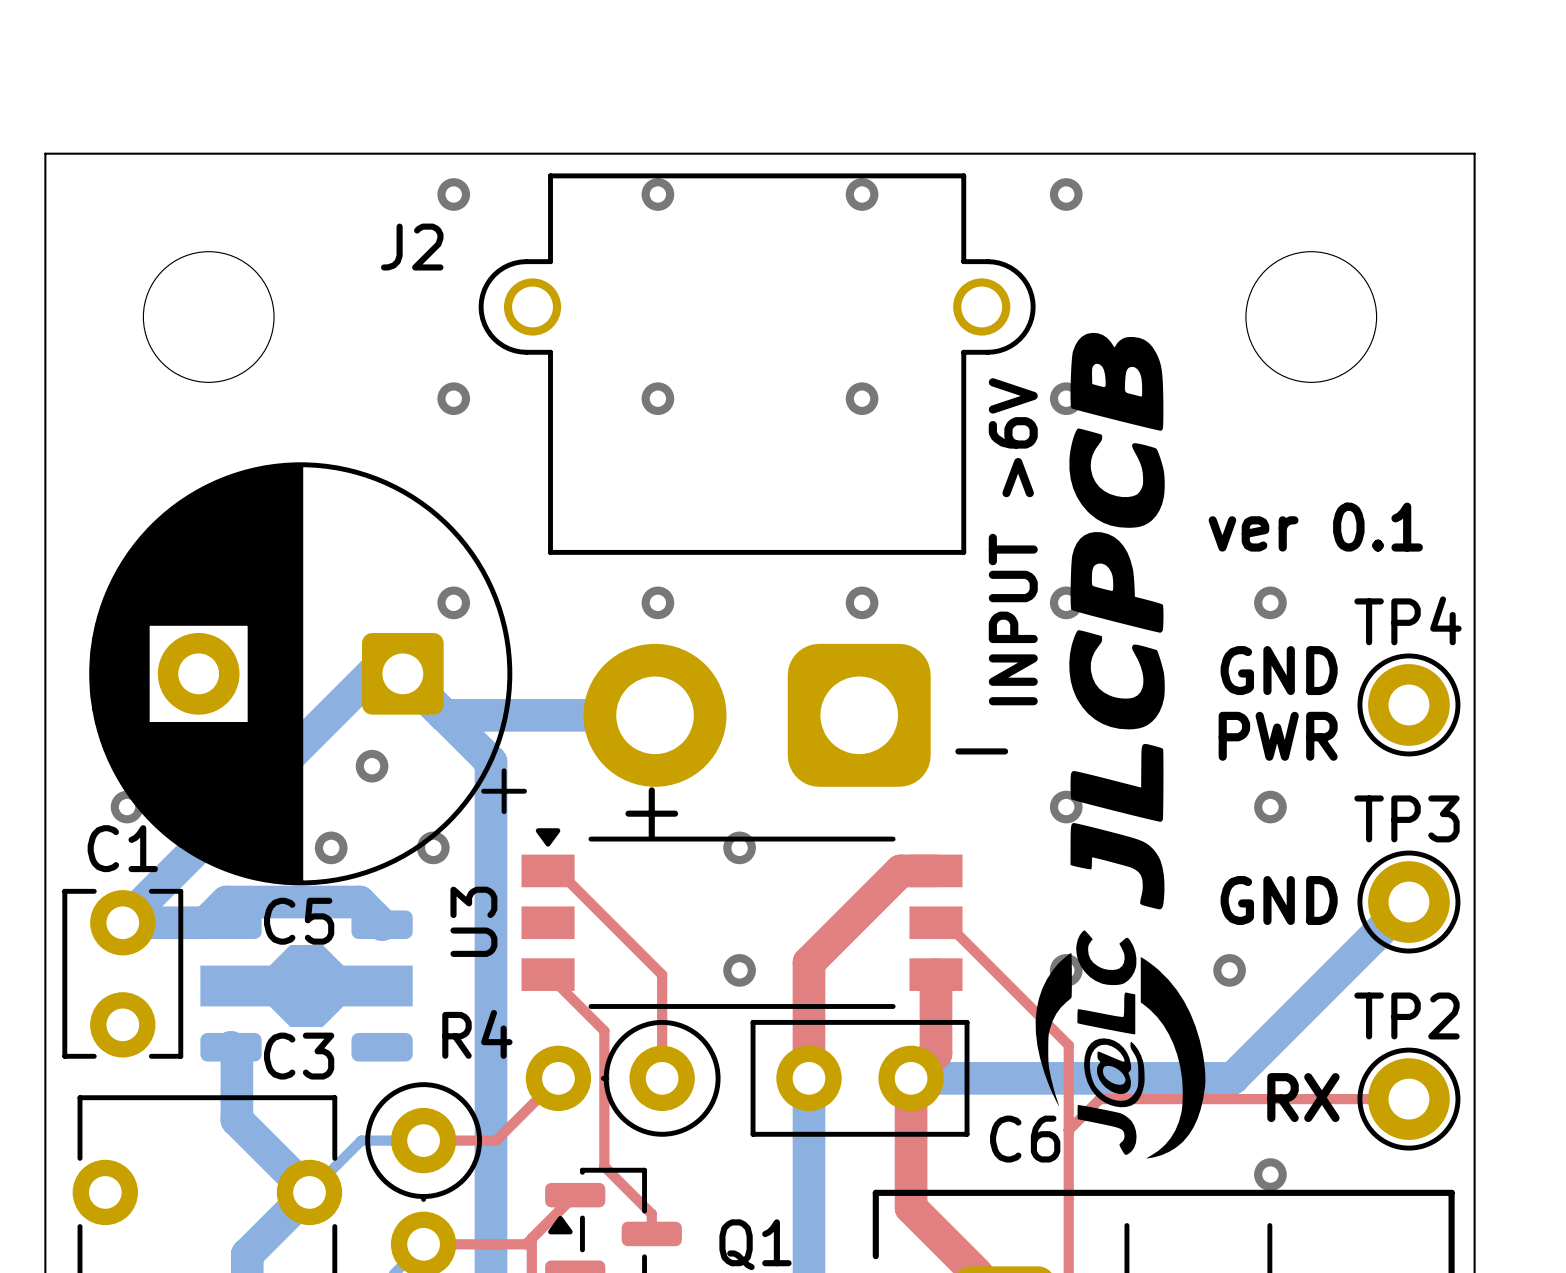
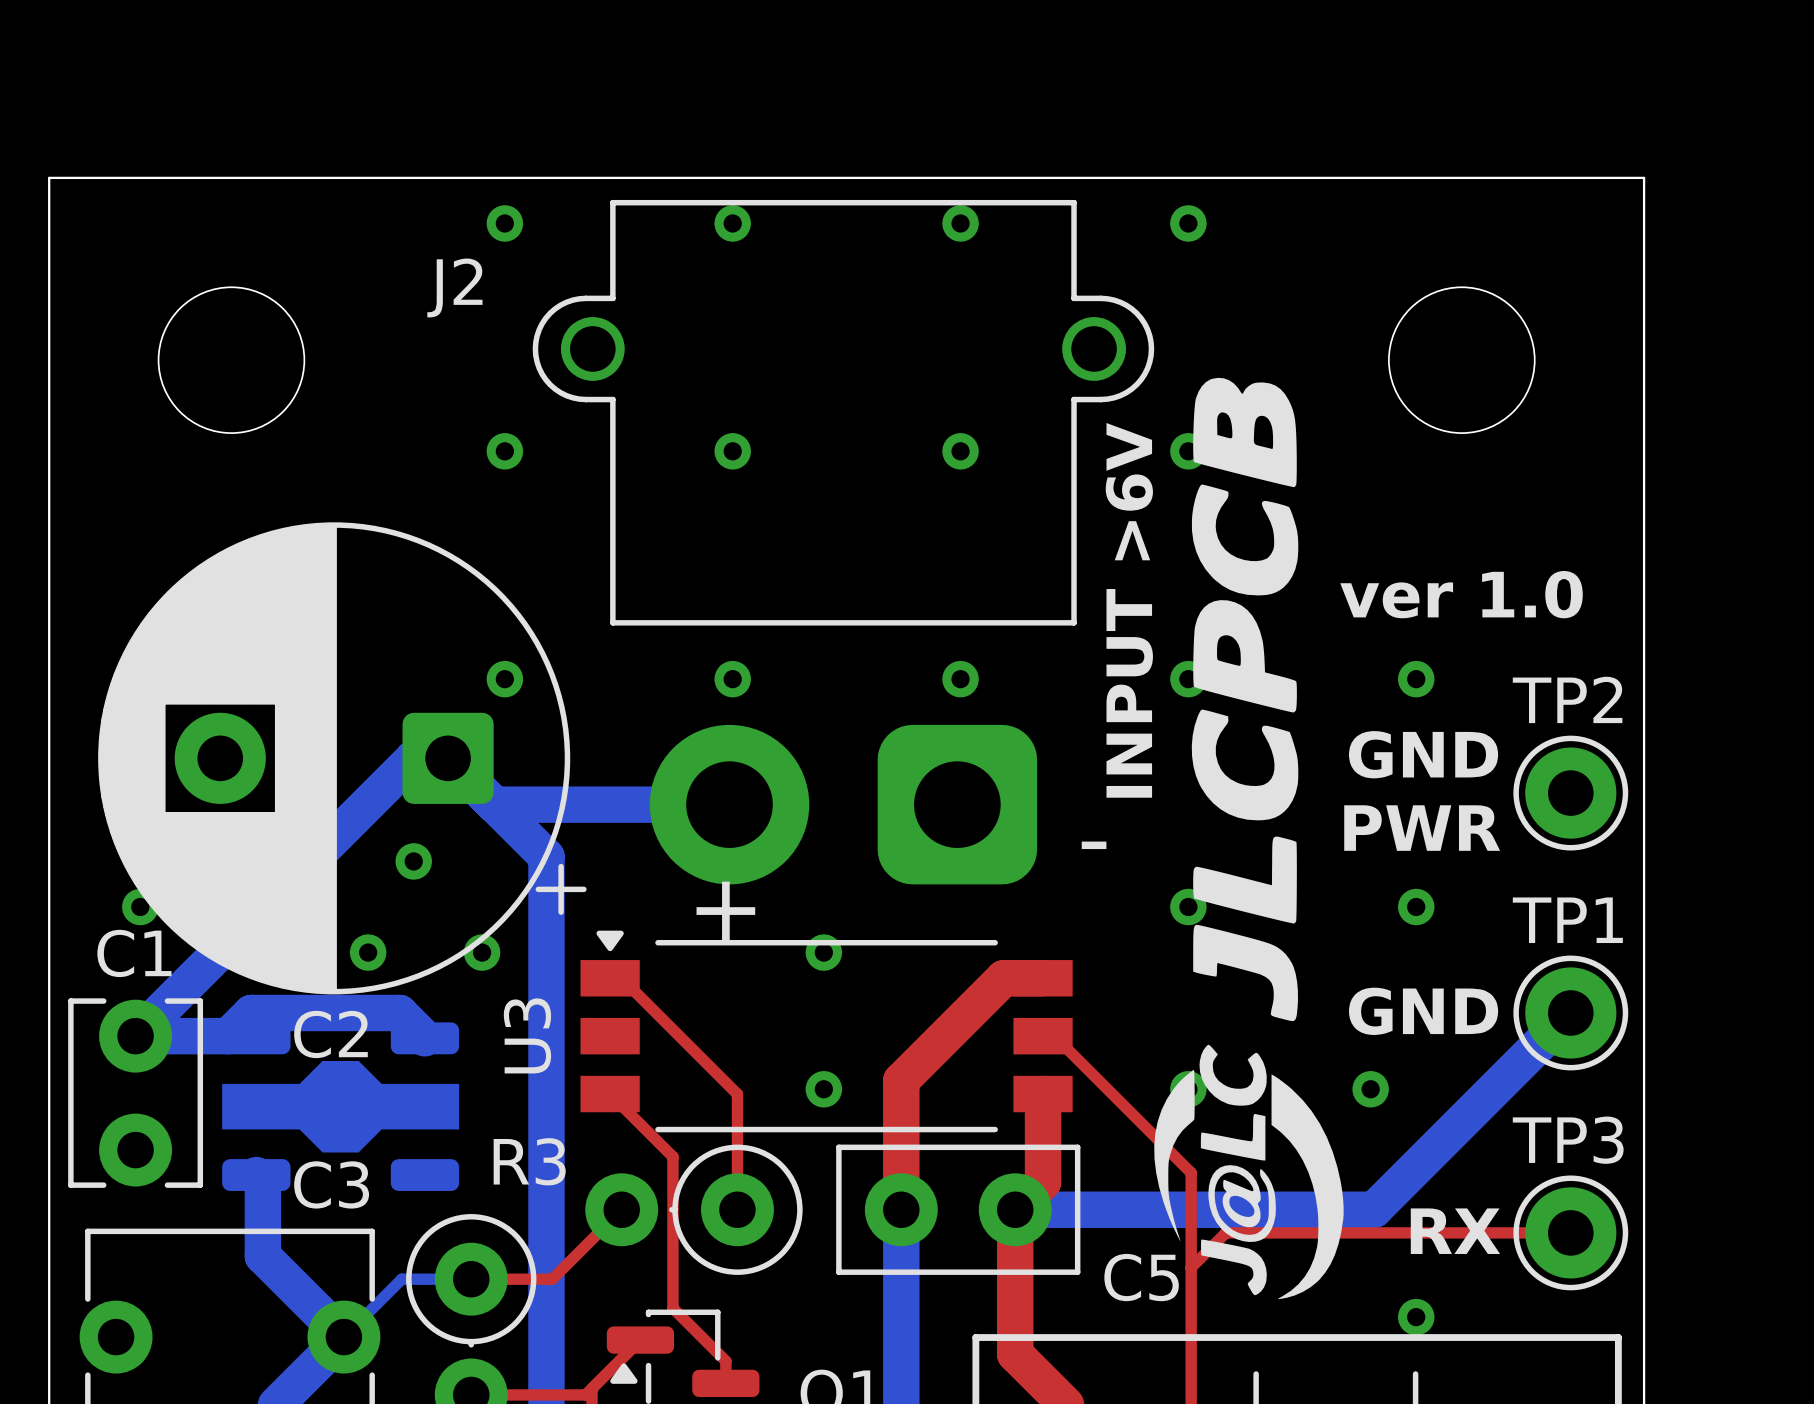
text: ver 0.1 (1315, 527) -> ver 1.0 (1461, 594)
TP4 name: TP4 (1407, 620) -> TP2 (1567, 699)
TP3 name: TP3 (1407, 818) -> TP1 (1567, 920)
C5 name: C5 (299, 921) -> C2 (330, 1034)
TP2 name: TP2 (1407, 1015) -> TP3 (1568, 1140)
R4 name: R4 (477, 1034) -> R3 (529, 1161)
C6 name: C6 (1025, 1139) -> C5 (1141, 1277)

